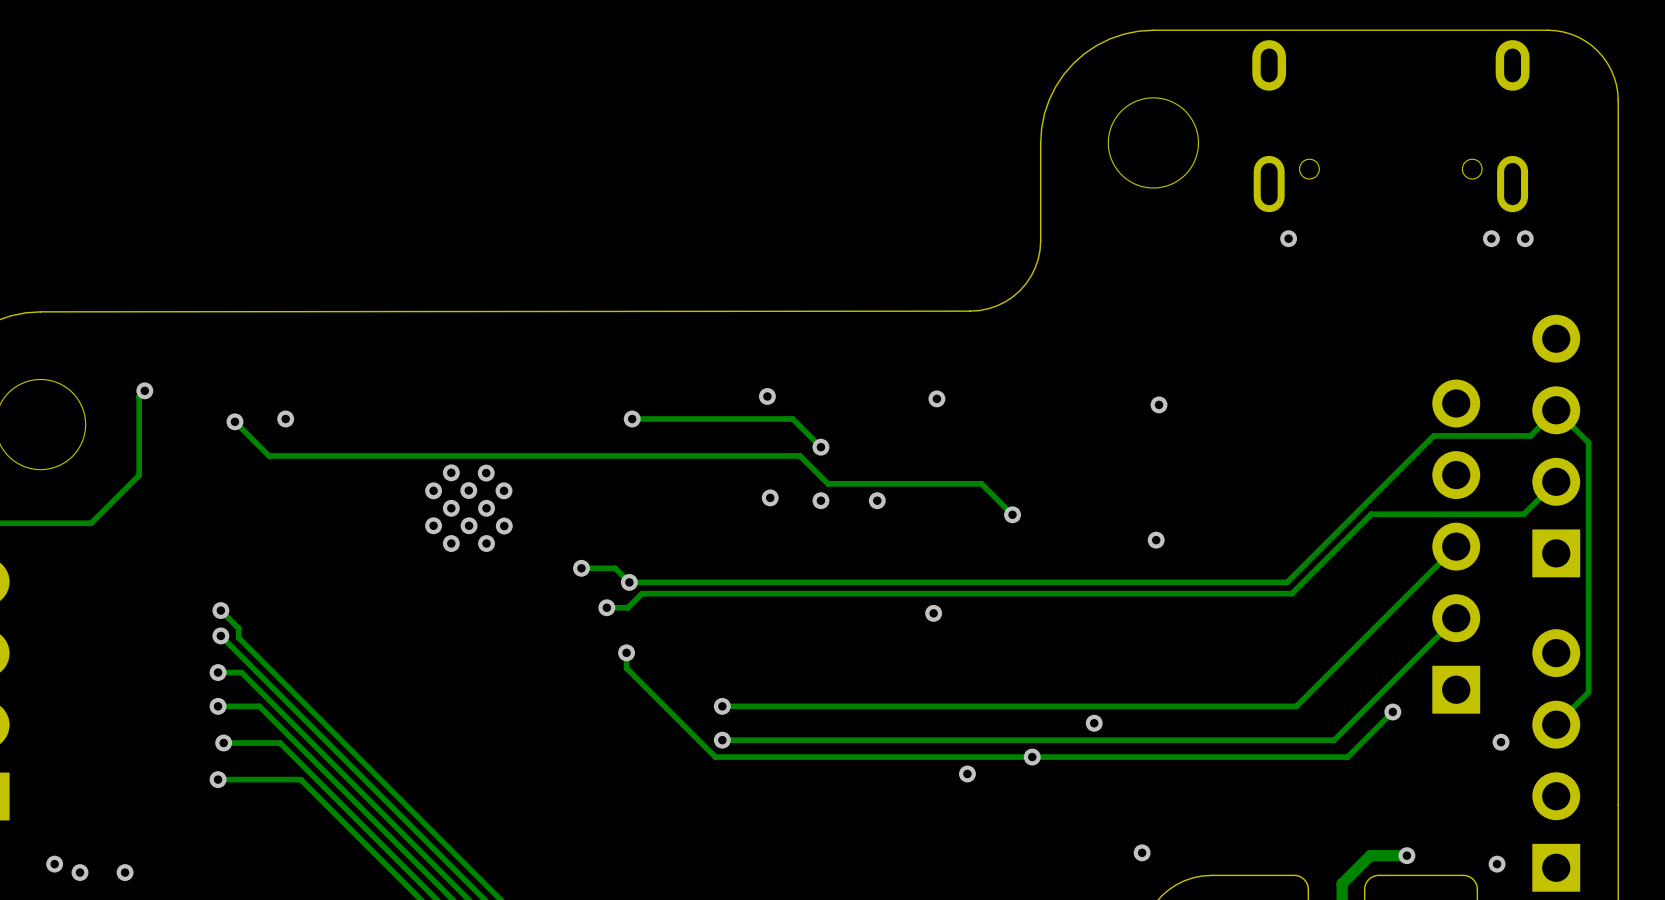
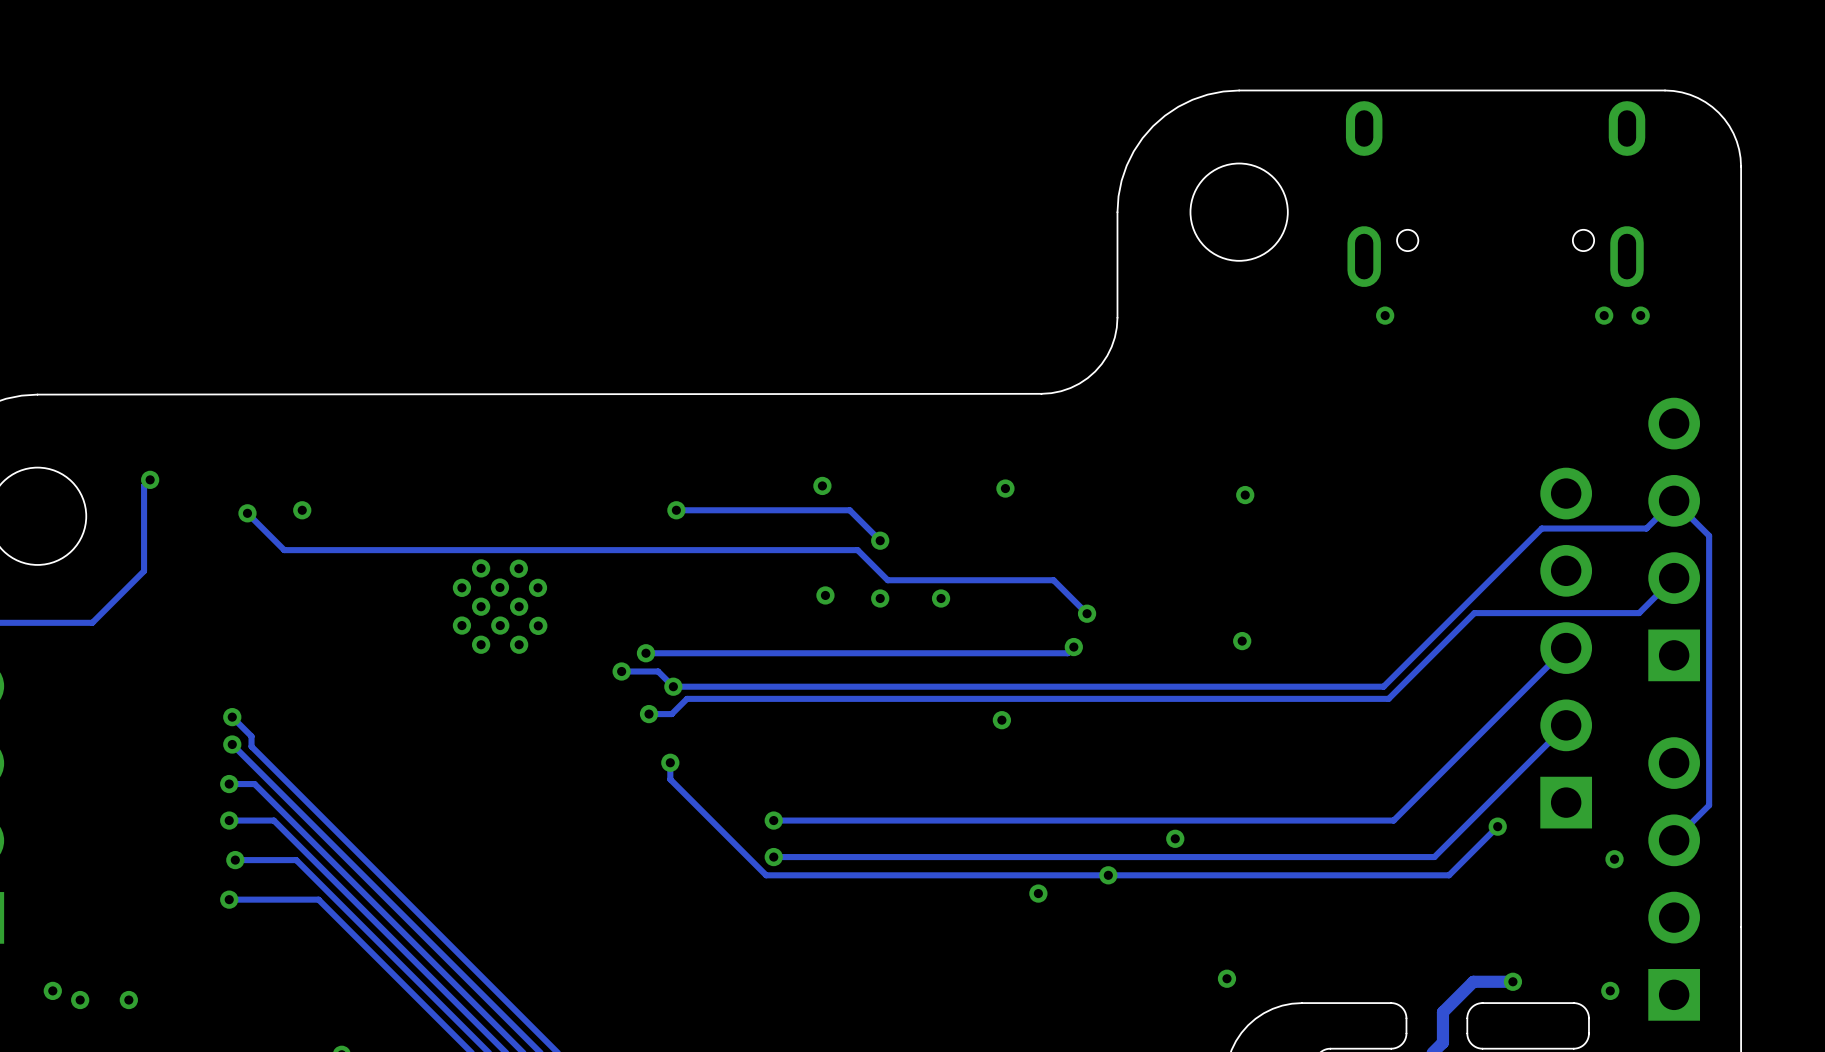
track: none -> (1073, 647) (1067, 653) (645, 653)
via: none -> (1073, 647)
via: none -> (645, 653)

